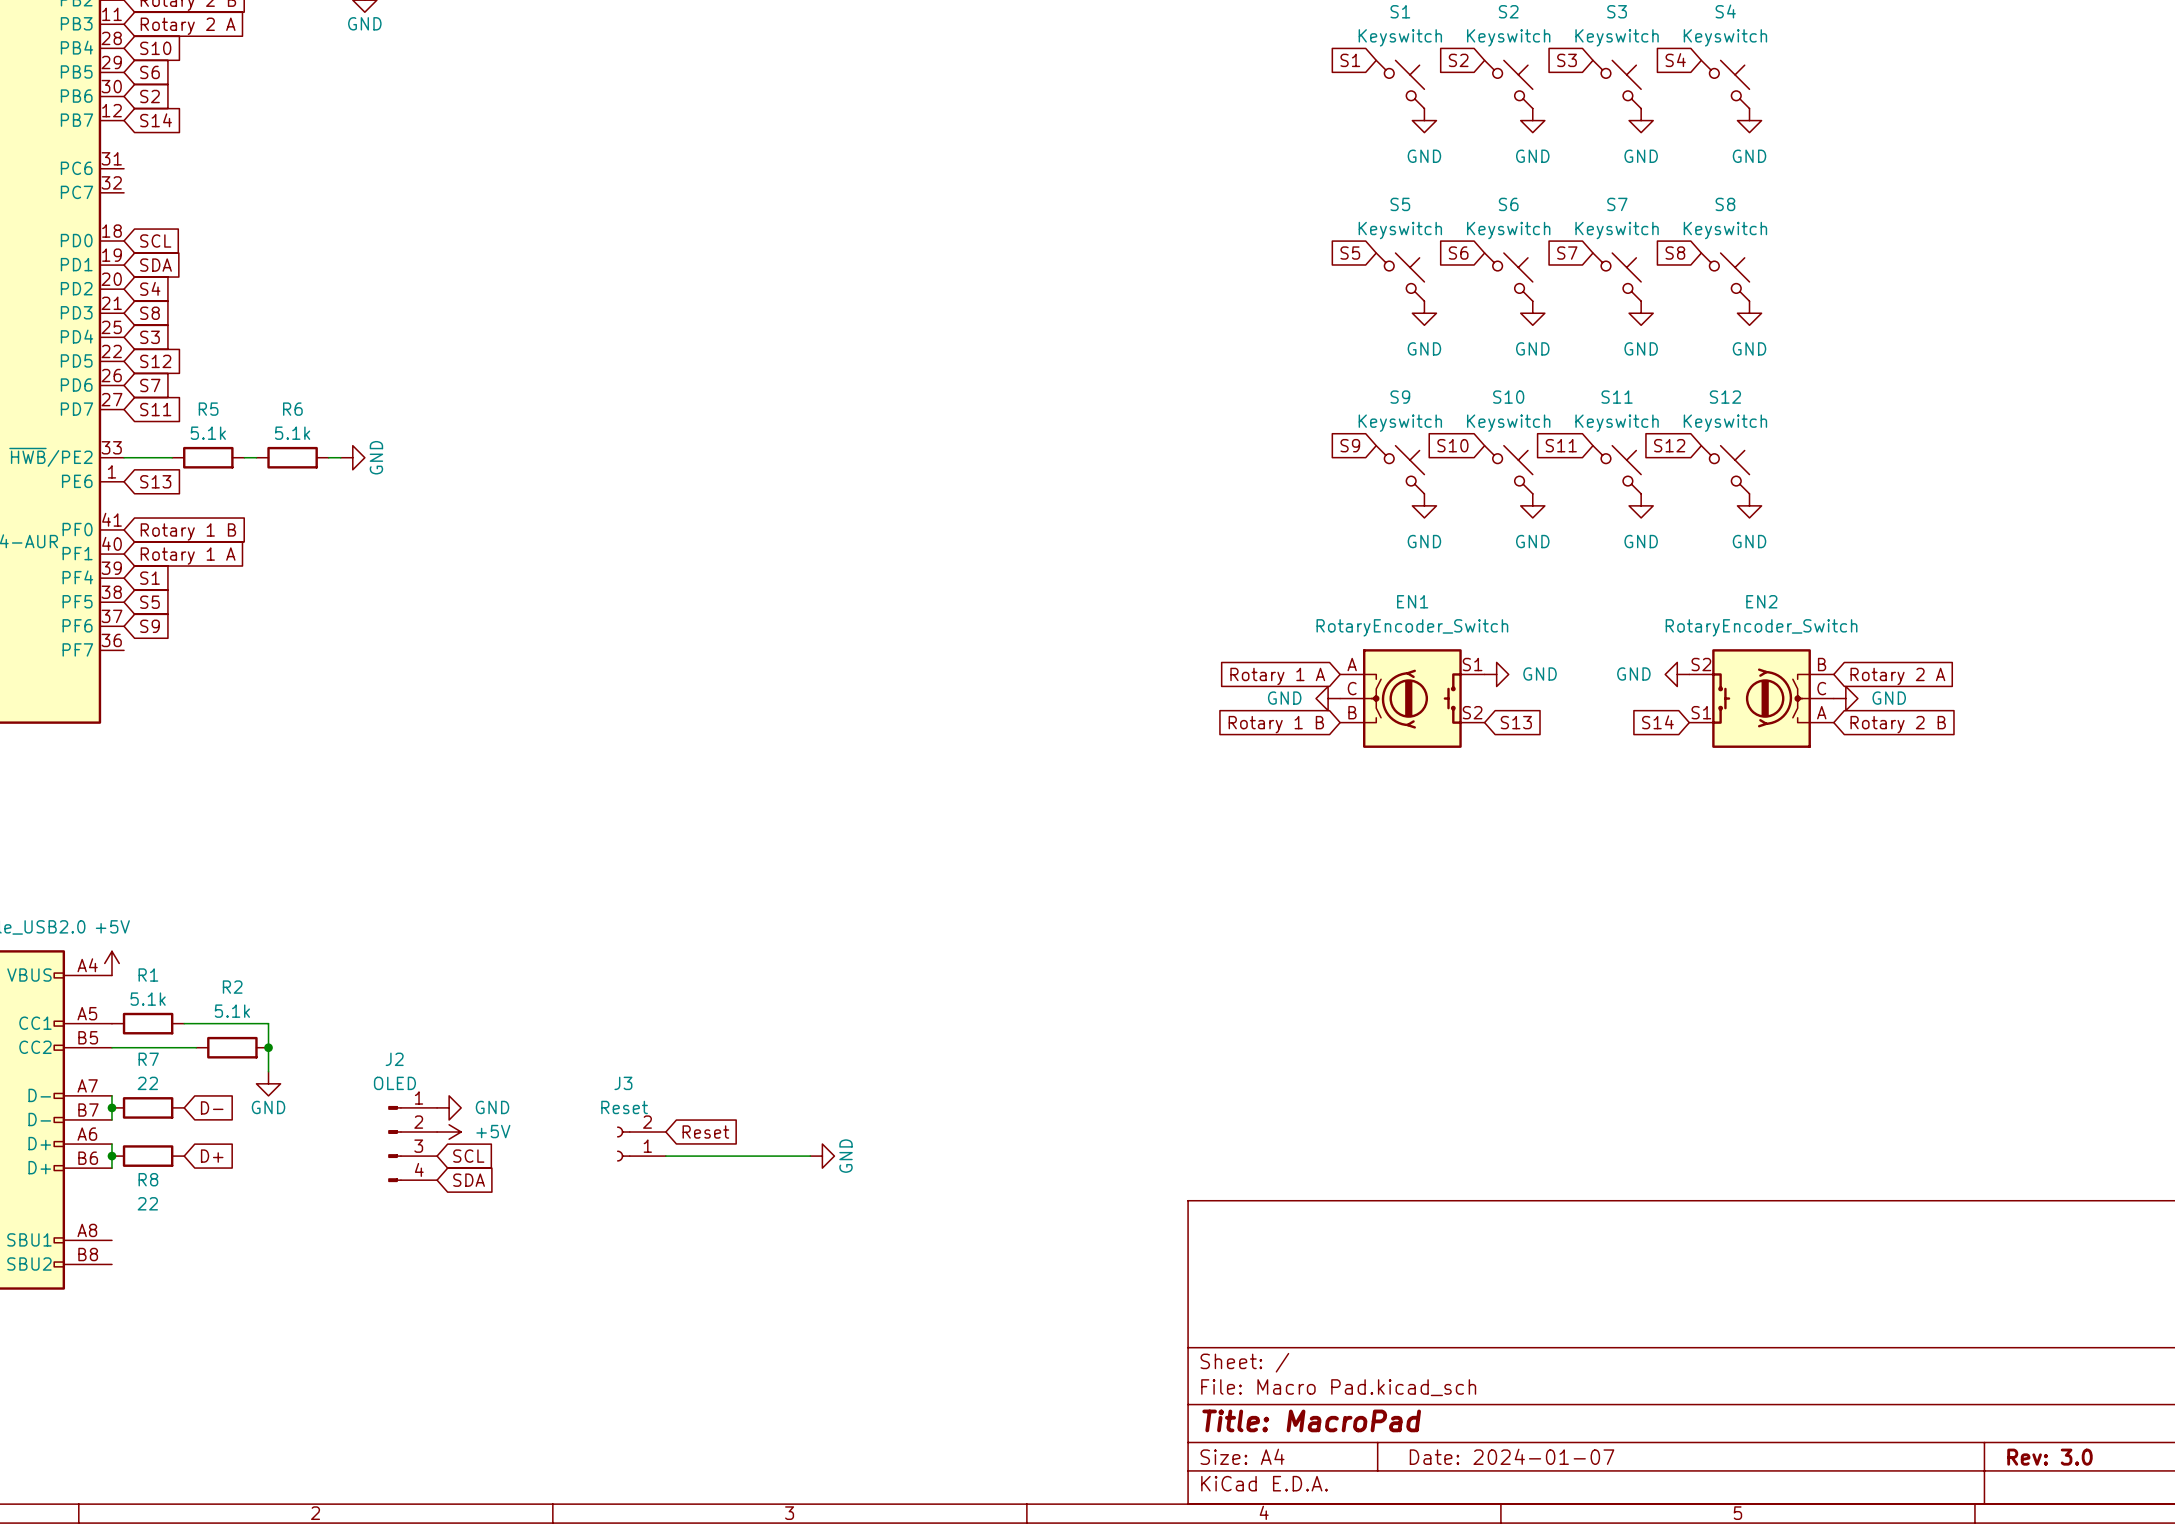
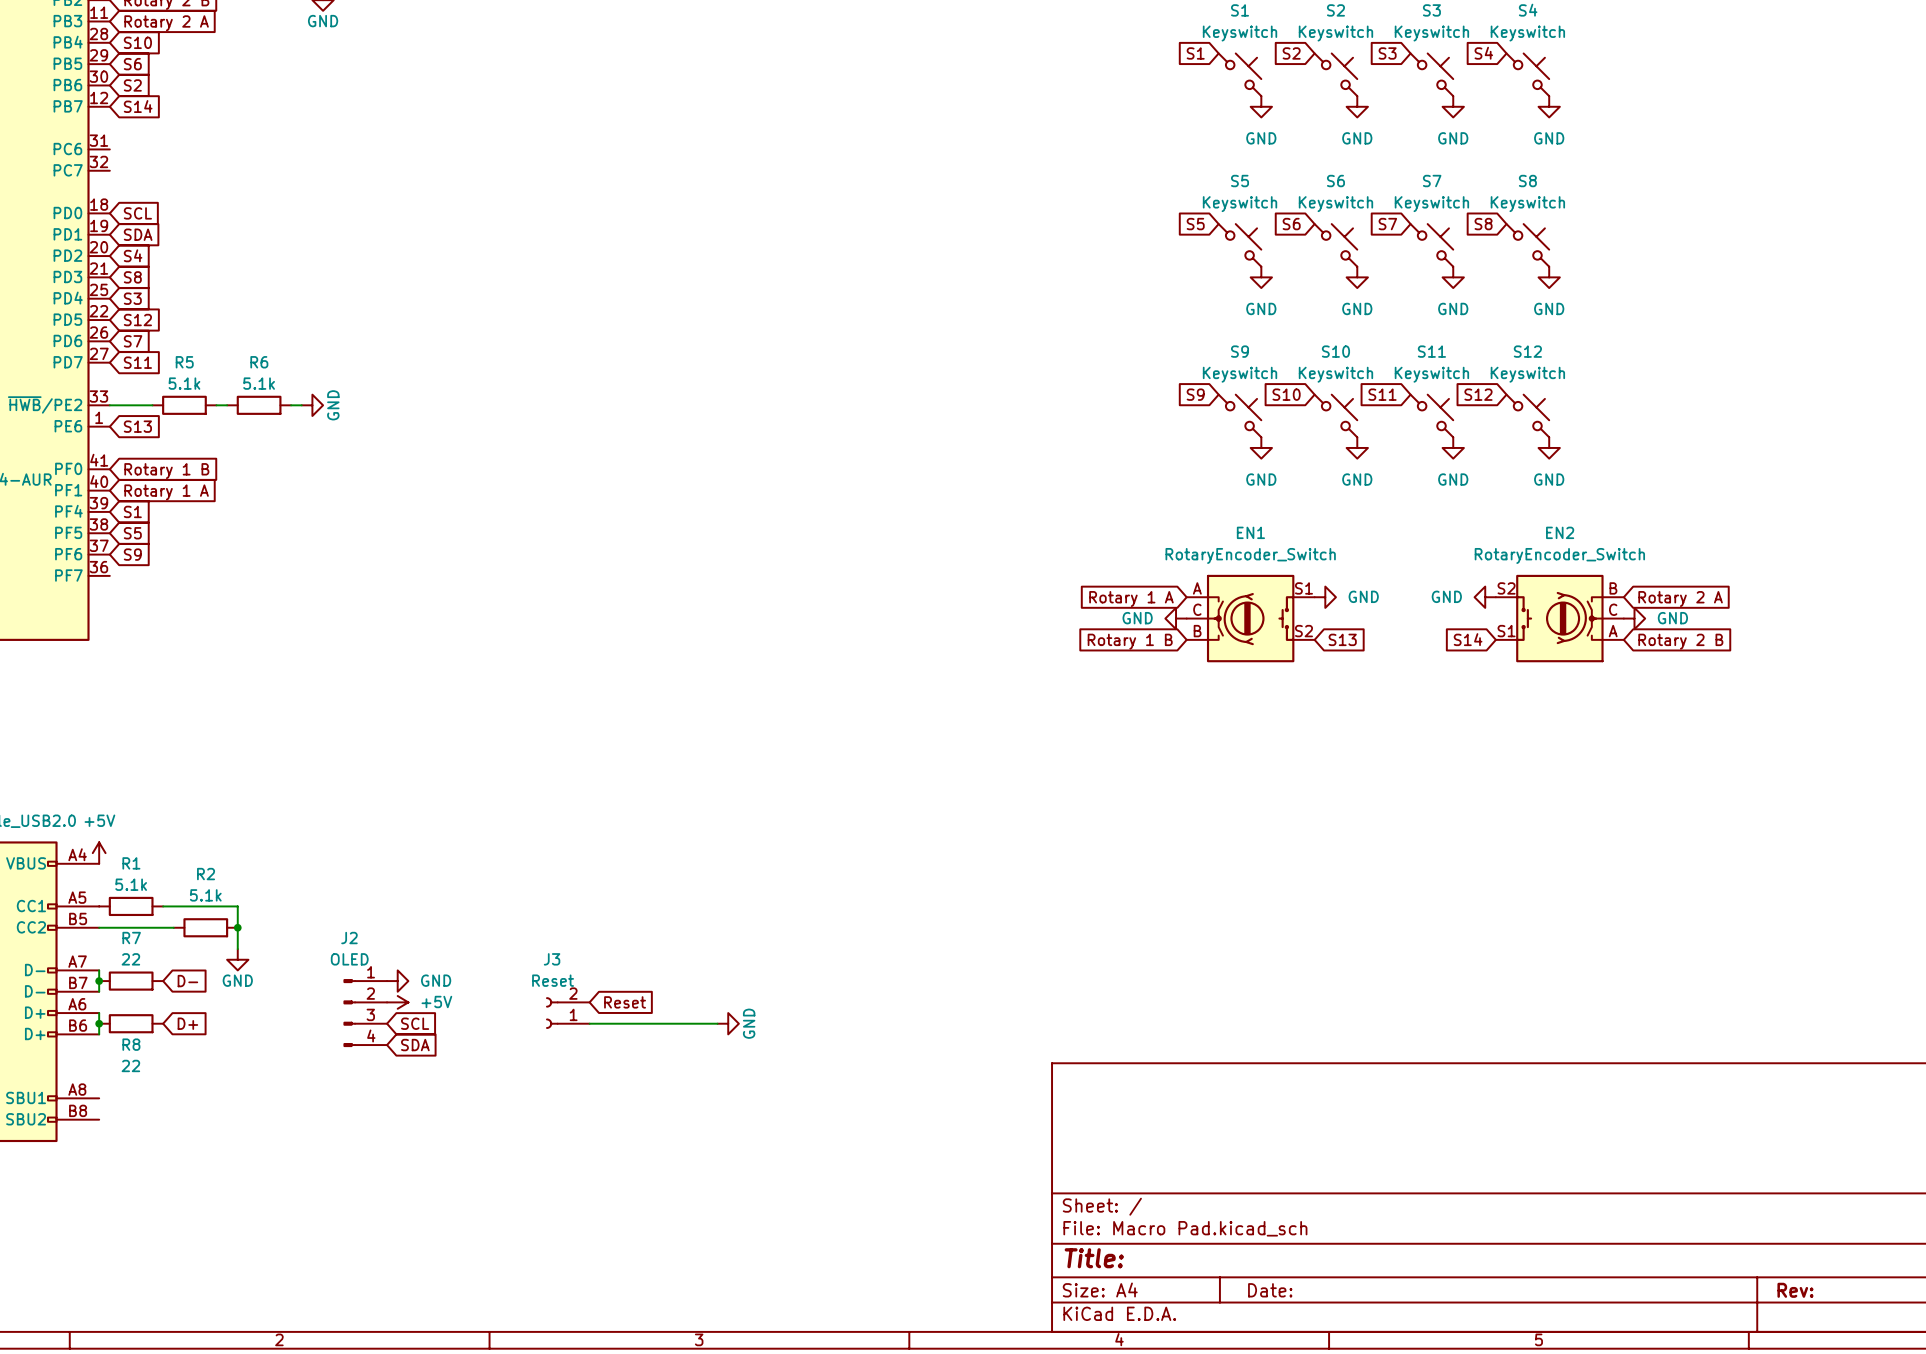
title block: Title: MacroPad (1311, 1420) -> Title: (1094, 1258)
title block: Date: 2024-01-07 (1512, 1456) -> Date: (1270, 1290)
title block: Rev: 3.0 (2049, 1457) -> Rev: (1795, 1290)

